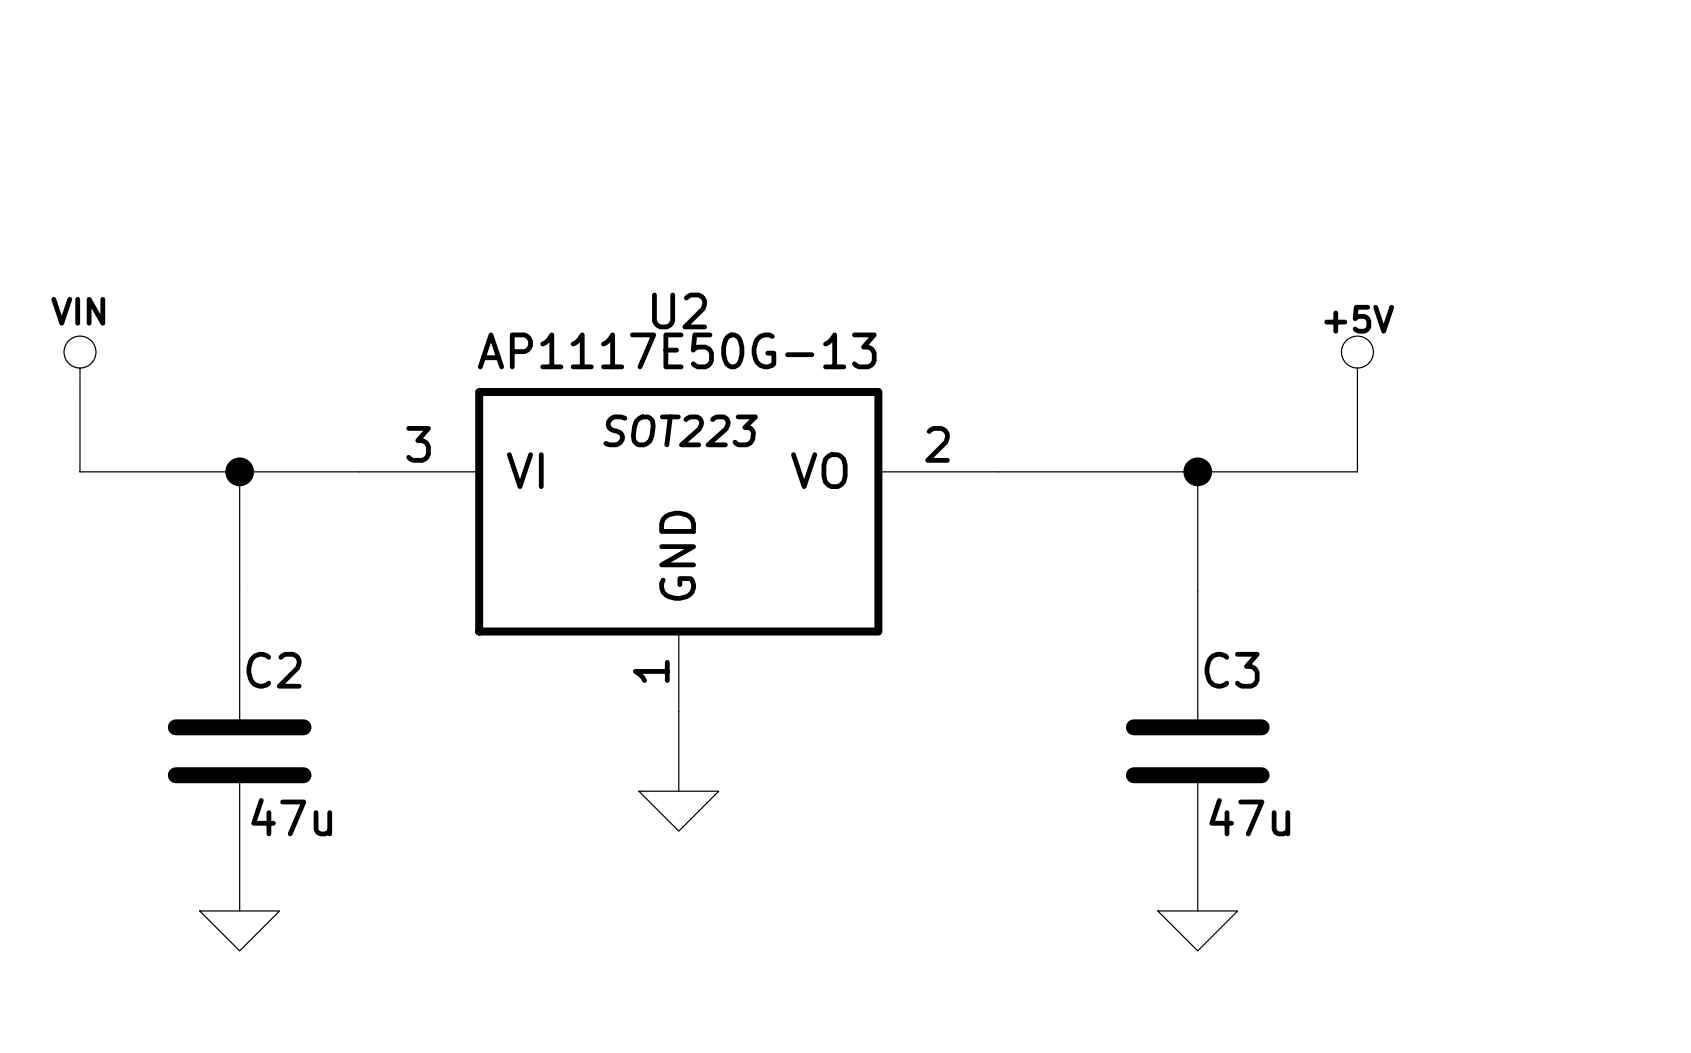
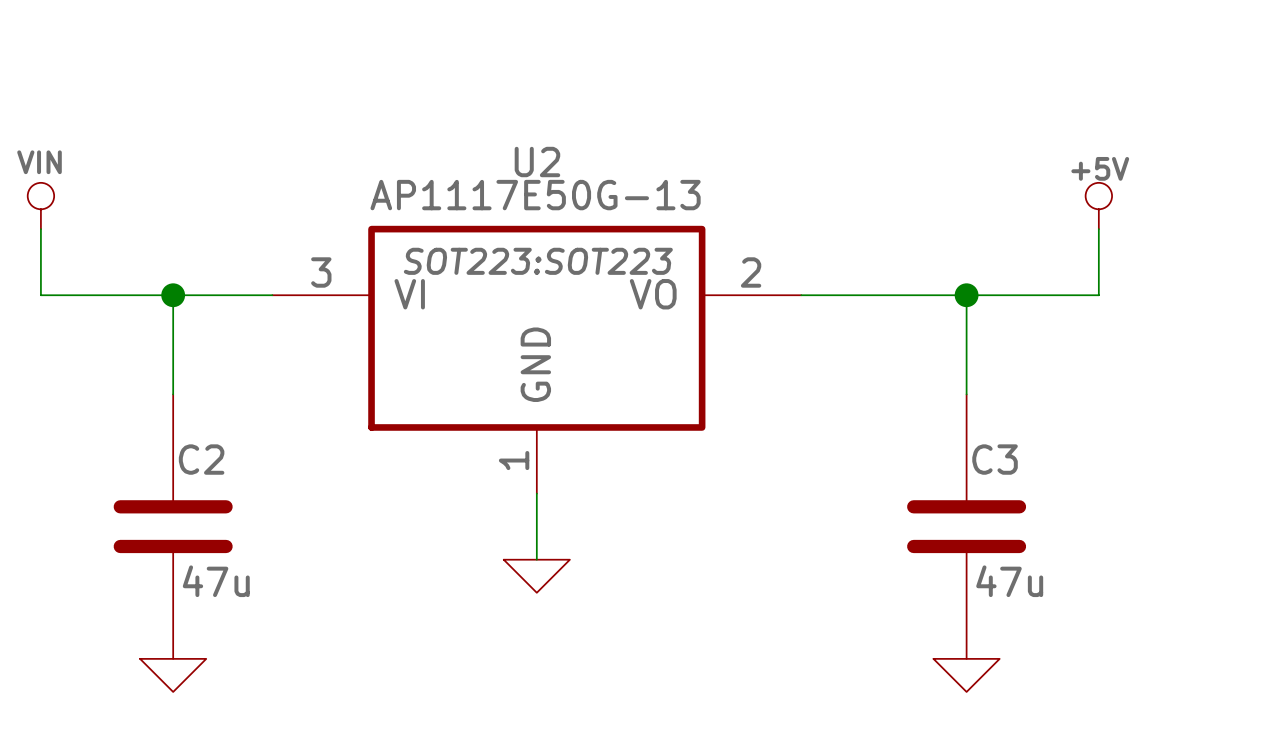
U2 text: SOT223 (680, 430) -> SOT223:SOT223 (538, 261)

